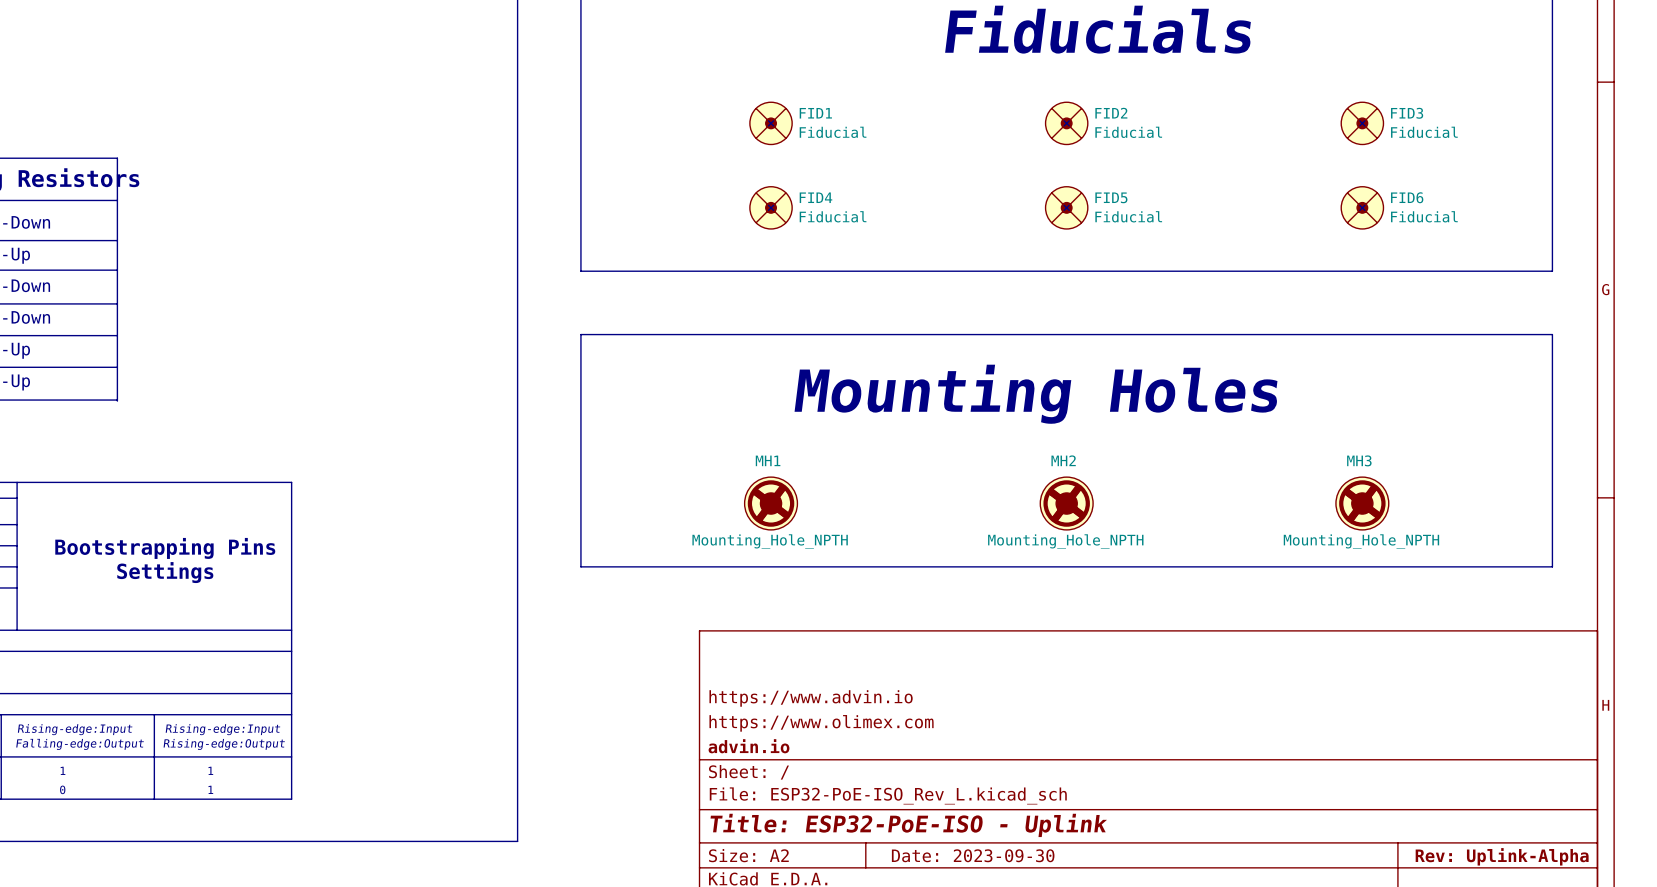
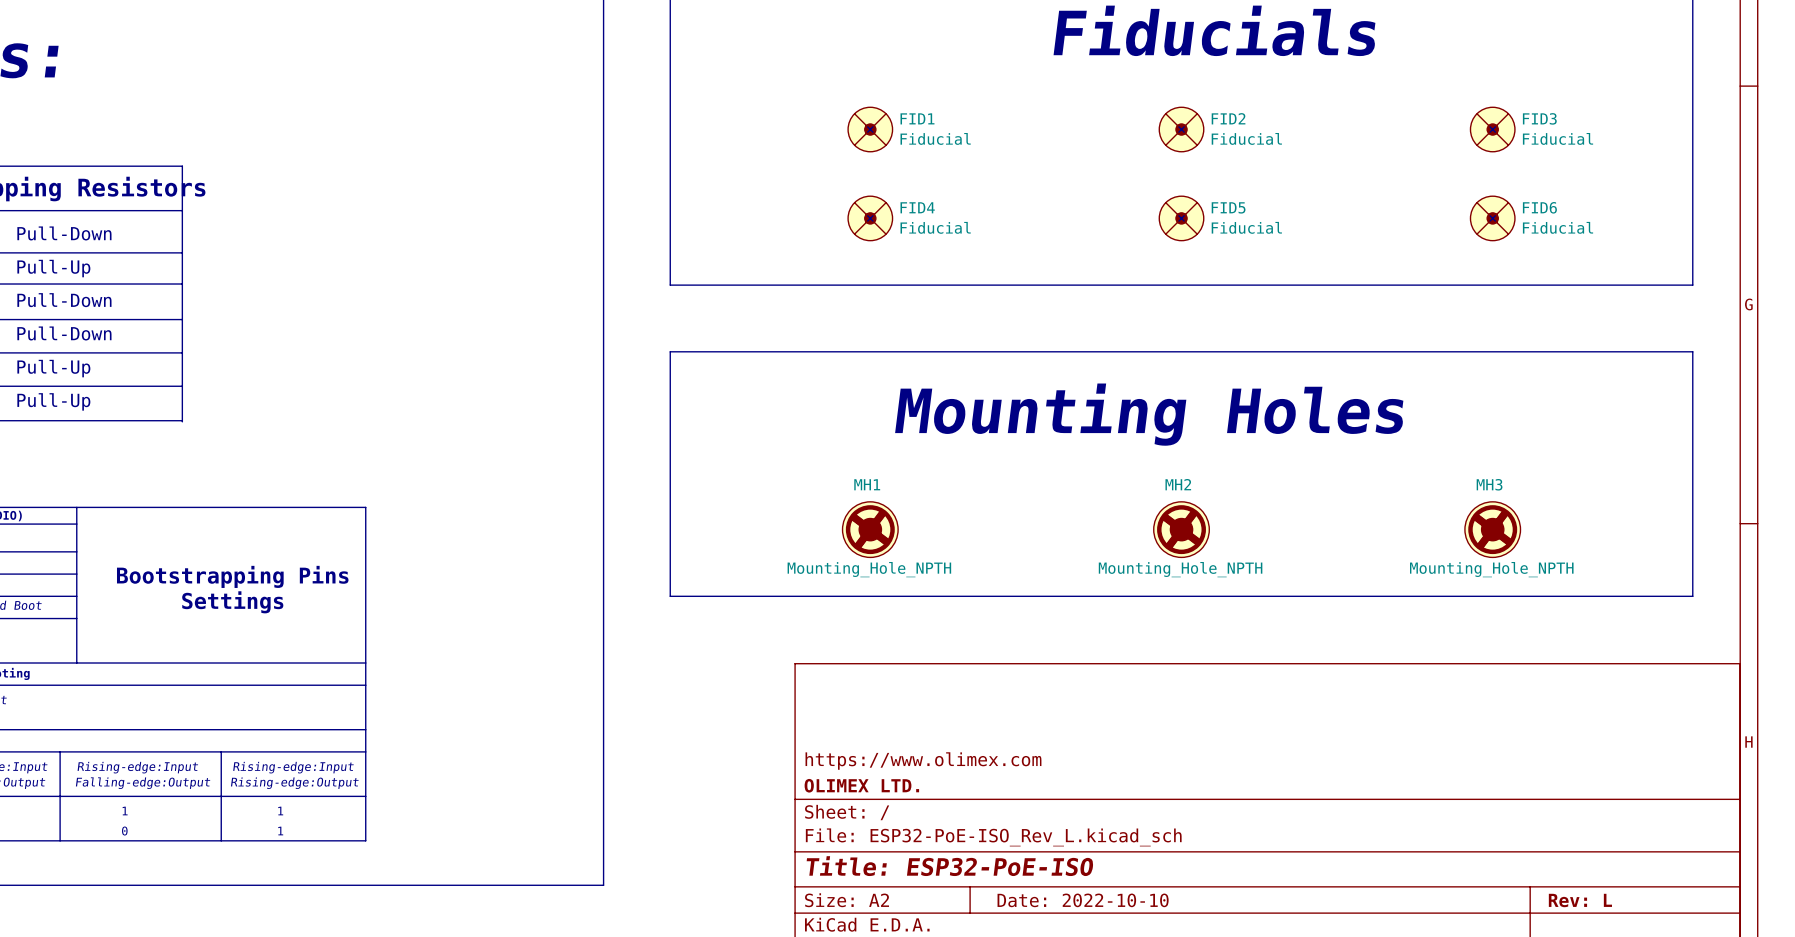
title block: https://www.advin.io (811, 698) -> none
title block: advin.io (749, 746) -> OLIMEX LTD. (861, 785)
title block: Title: ESP32-PoE-ISO - Uplink (908, 825) -> Title: ESP32-PoE-ISO (950, 866)
title block: Date: 2023-09-30 (973, 855) -> Date: 2022-10-10 (1083, 900)
title block: Rev: Uplink-Alpha (1502, 856) -> Rev: L (1580, 900)

